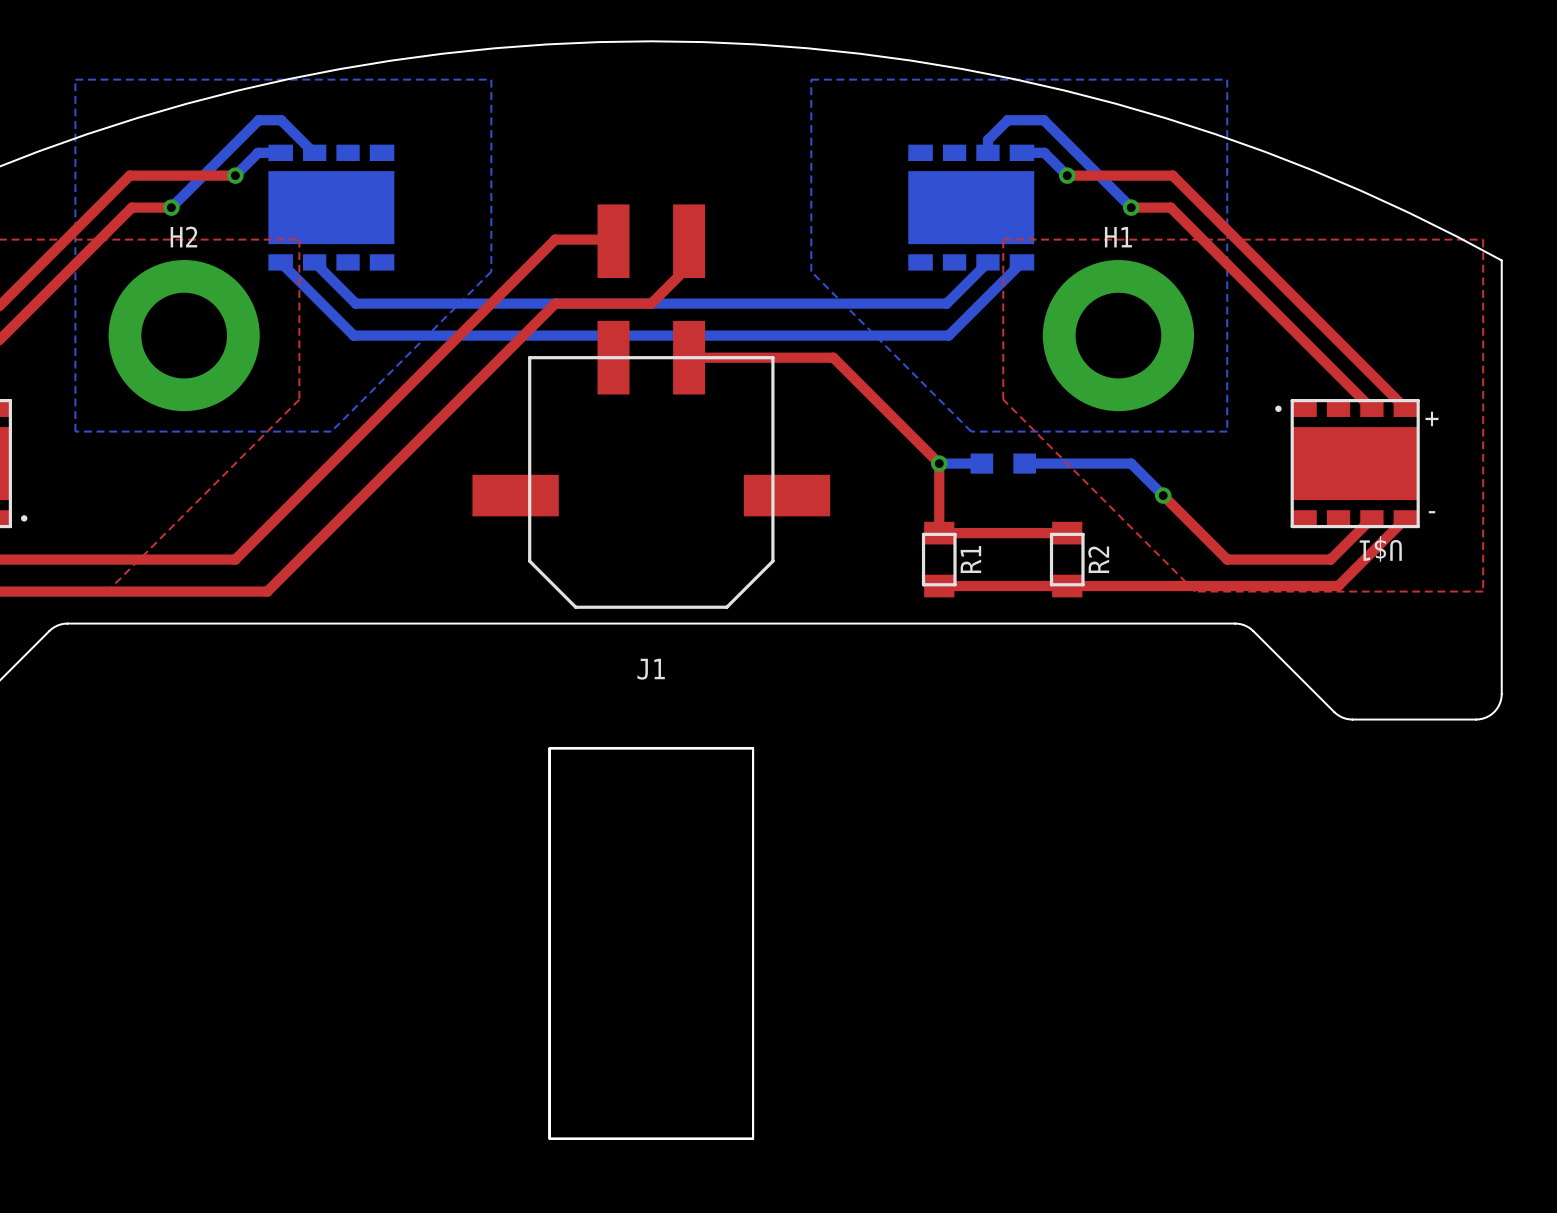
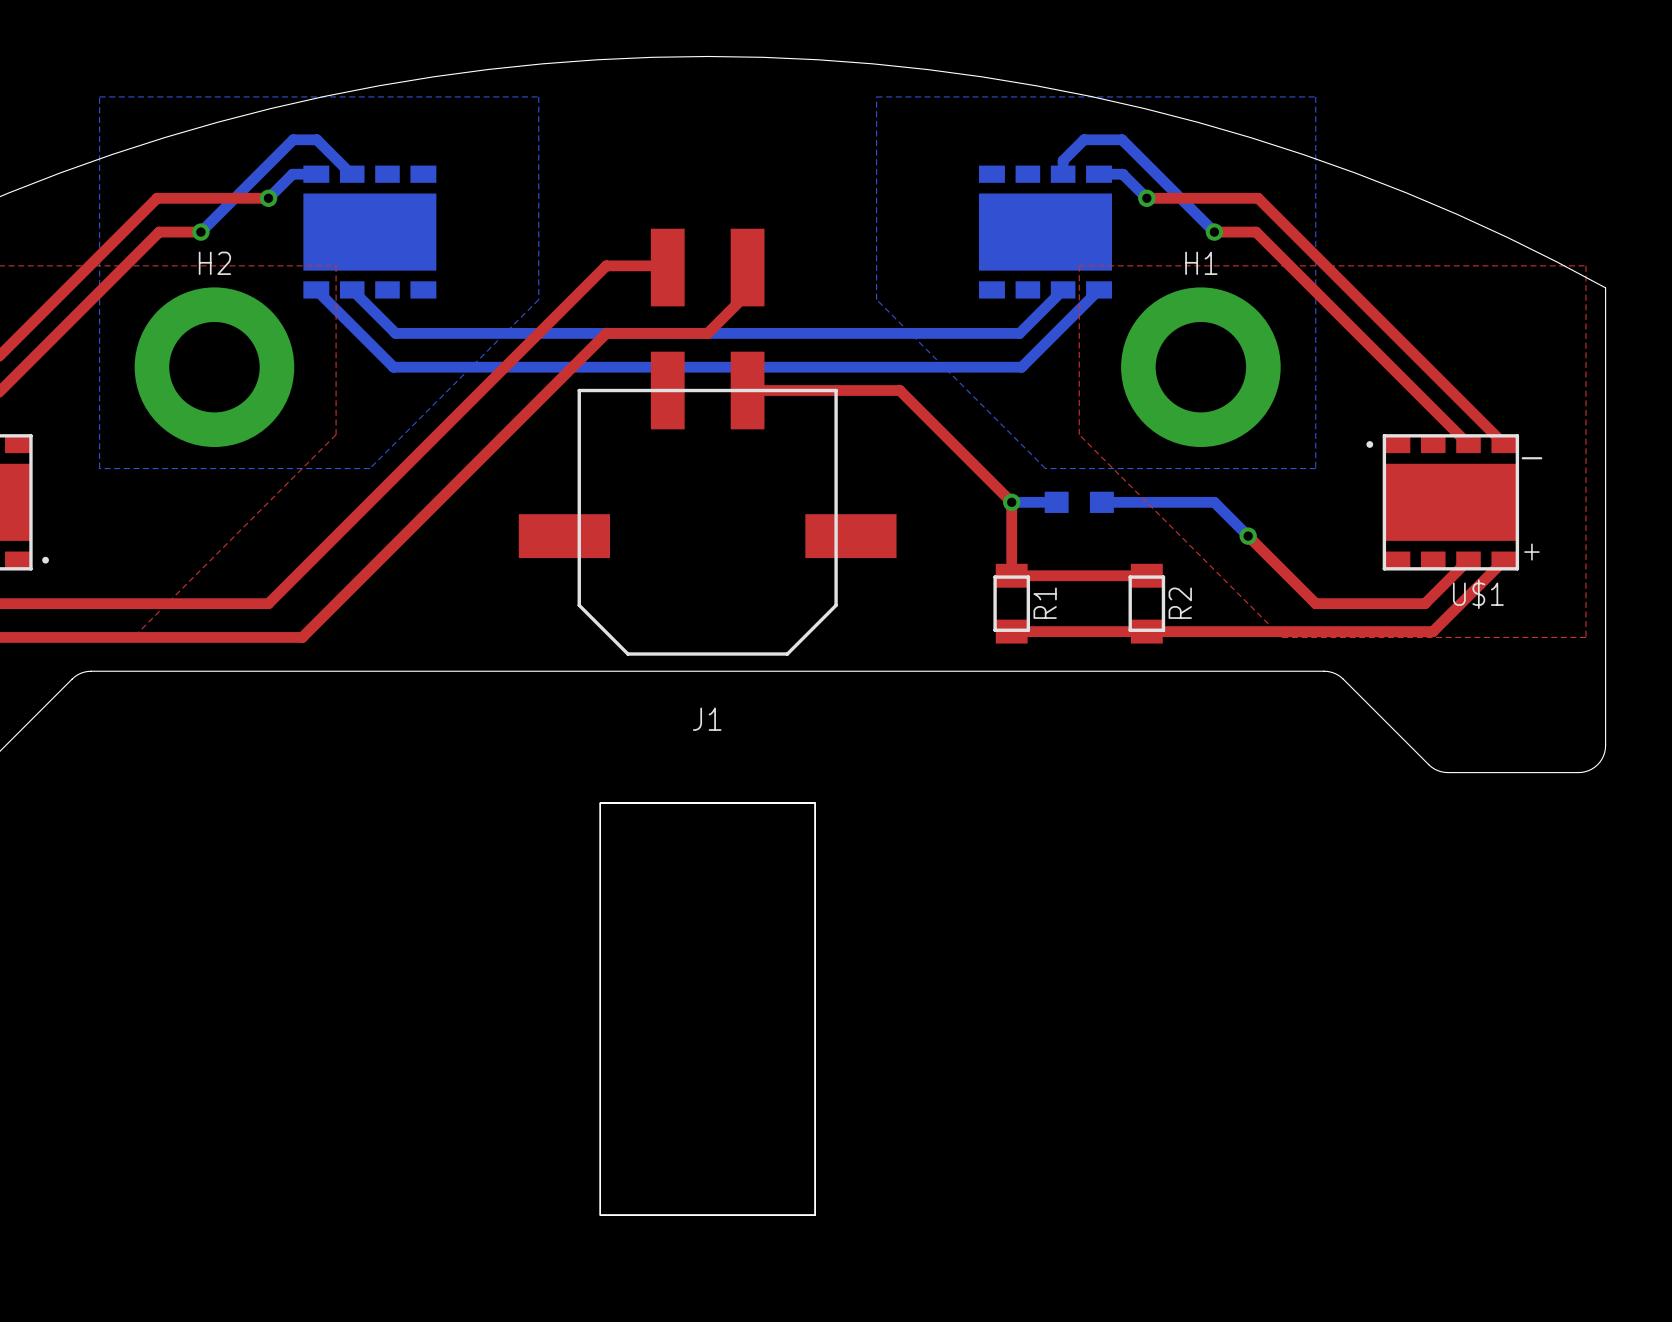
U$1 text position: + (1431, 418) -> + (1531, 552)
U$1 text position: - (1431, 512) -> - (1531, 458)
U$1 name rotation: 0° (1380, 548) -> 180° (1478, 594)

